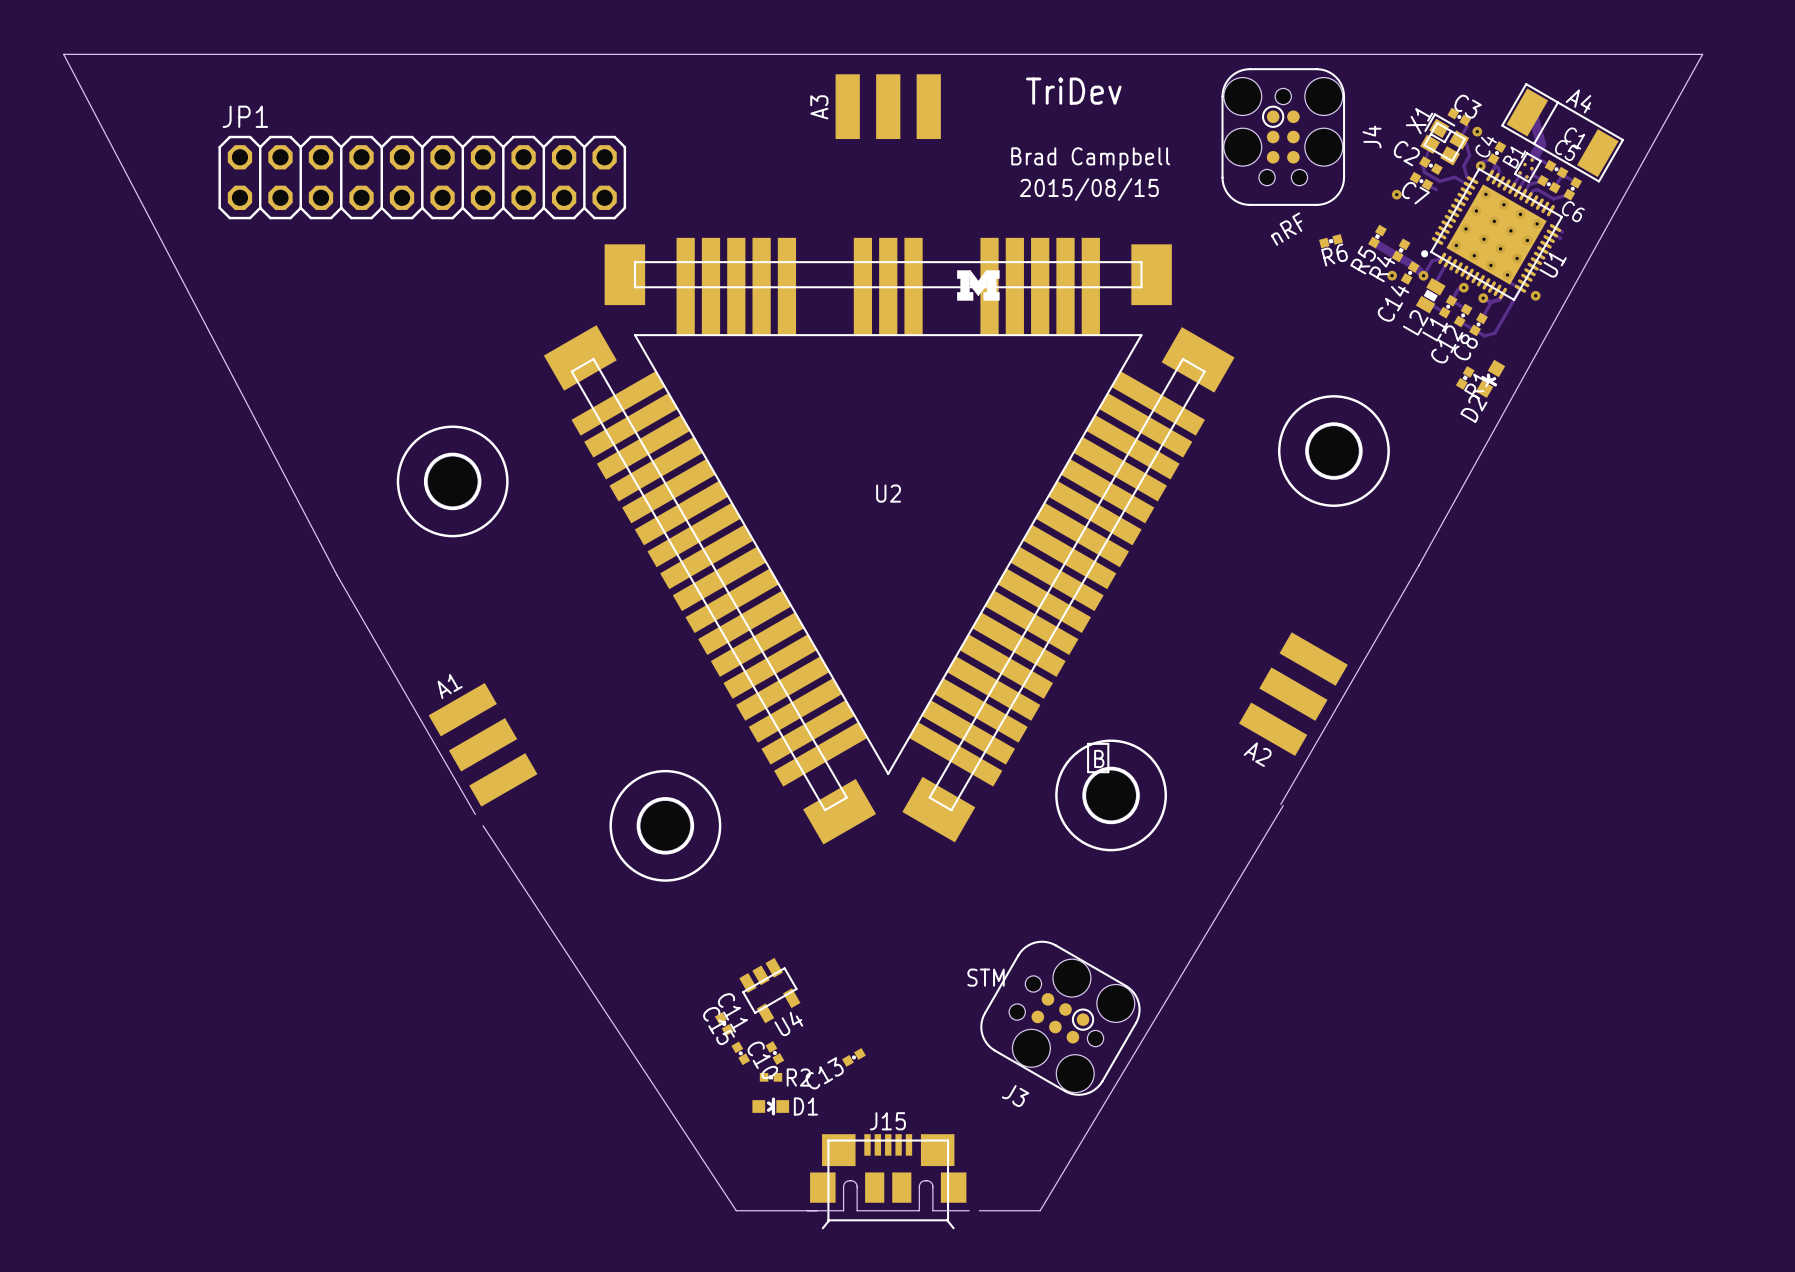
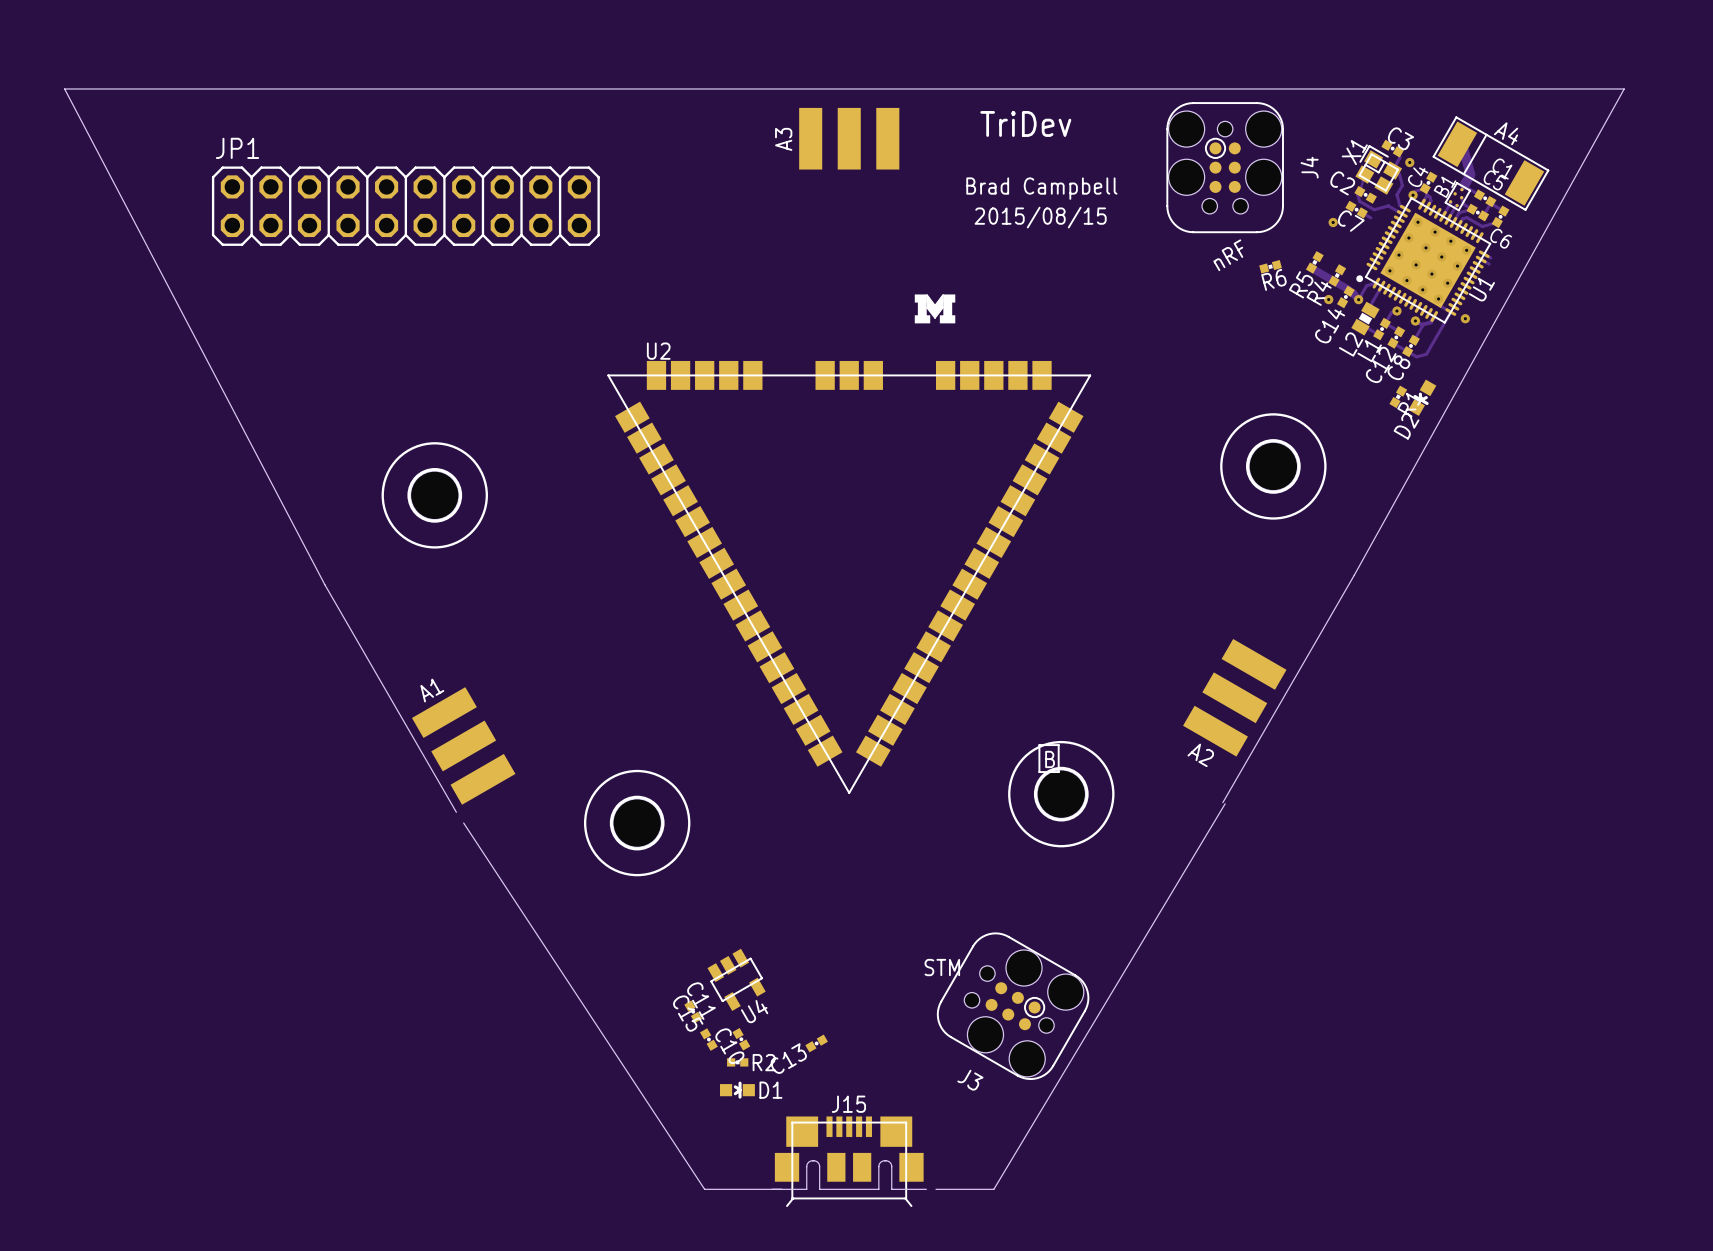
U2 footprint: [543, 237, 1235, 845] -> [607, 360, 1092, 794]
U2 name position: U2 (888, 493) -> U2 (658, 351)

